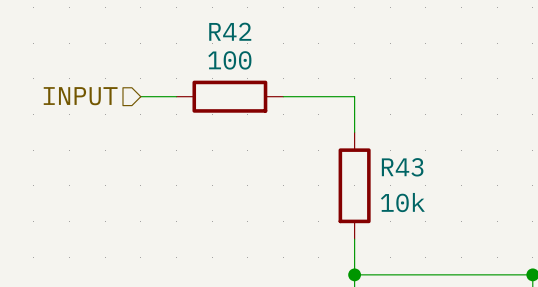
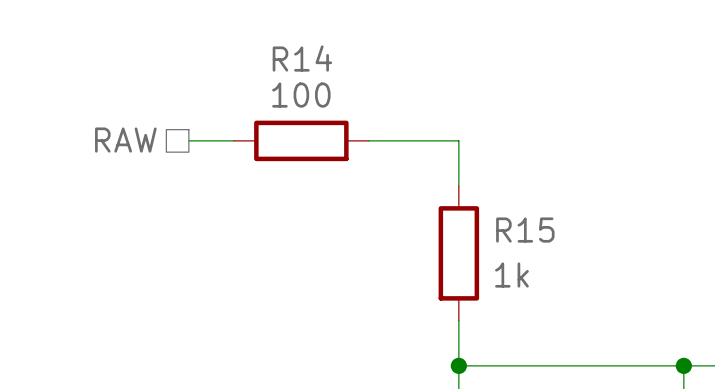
R42 name: R42 (230, 31) -> R14 (302, 58)
hierarchical label shape: input (80, 96) -> passive (125, 140)
hierarchical label: INPUT (80, 96) -> RAW (125, 140)
R43 name: R43 (402, 167) -> R15 (525, 230)
R43 value: 10k (402, 202) -> 1k (511, 275)

